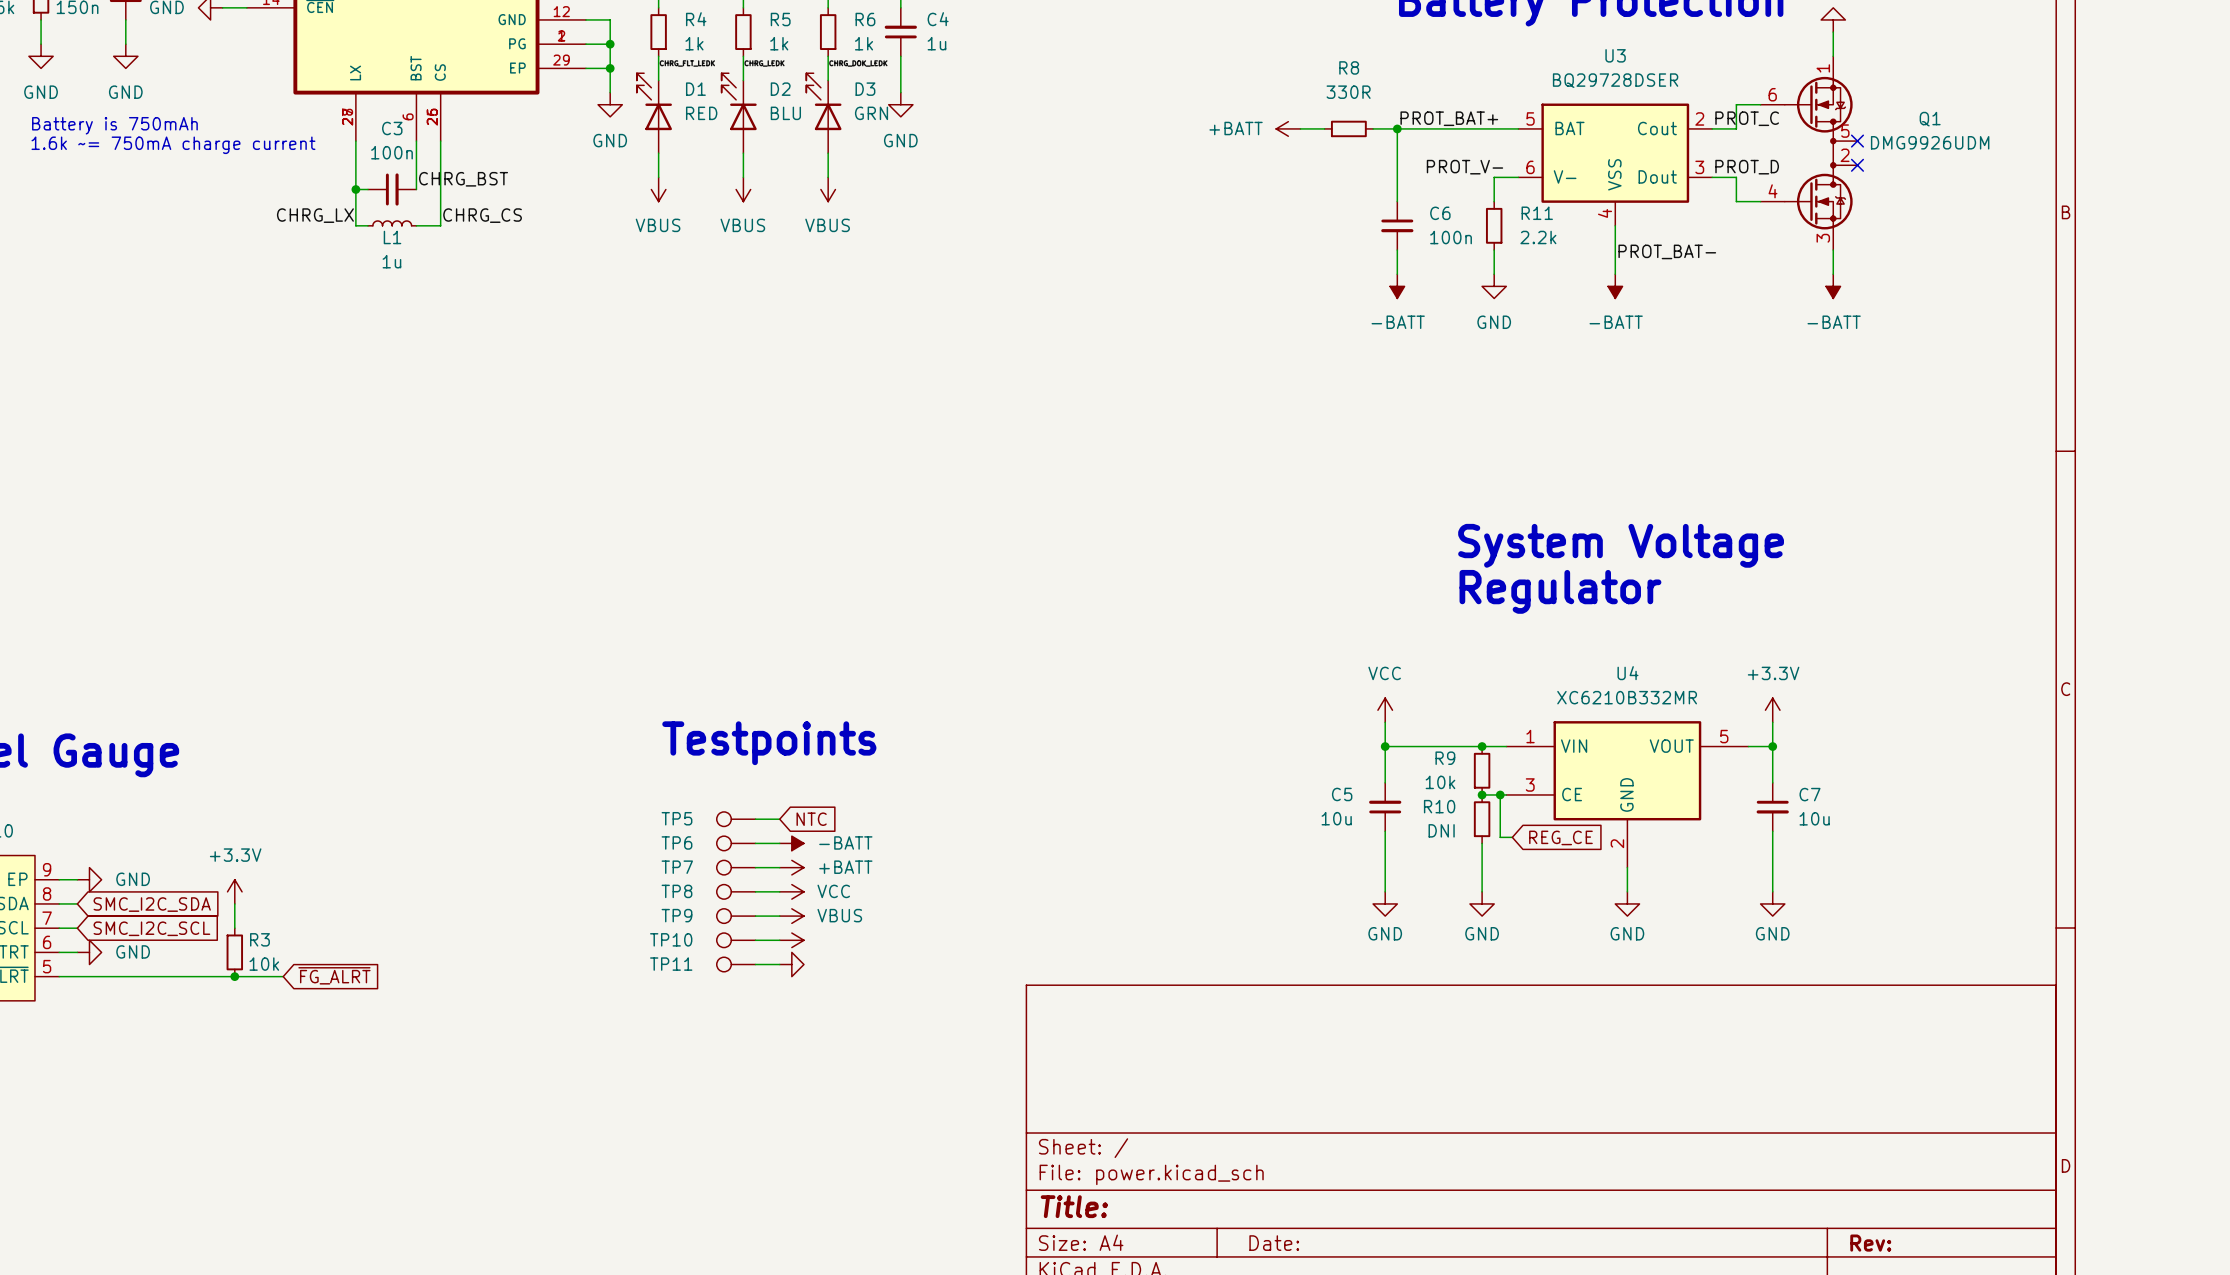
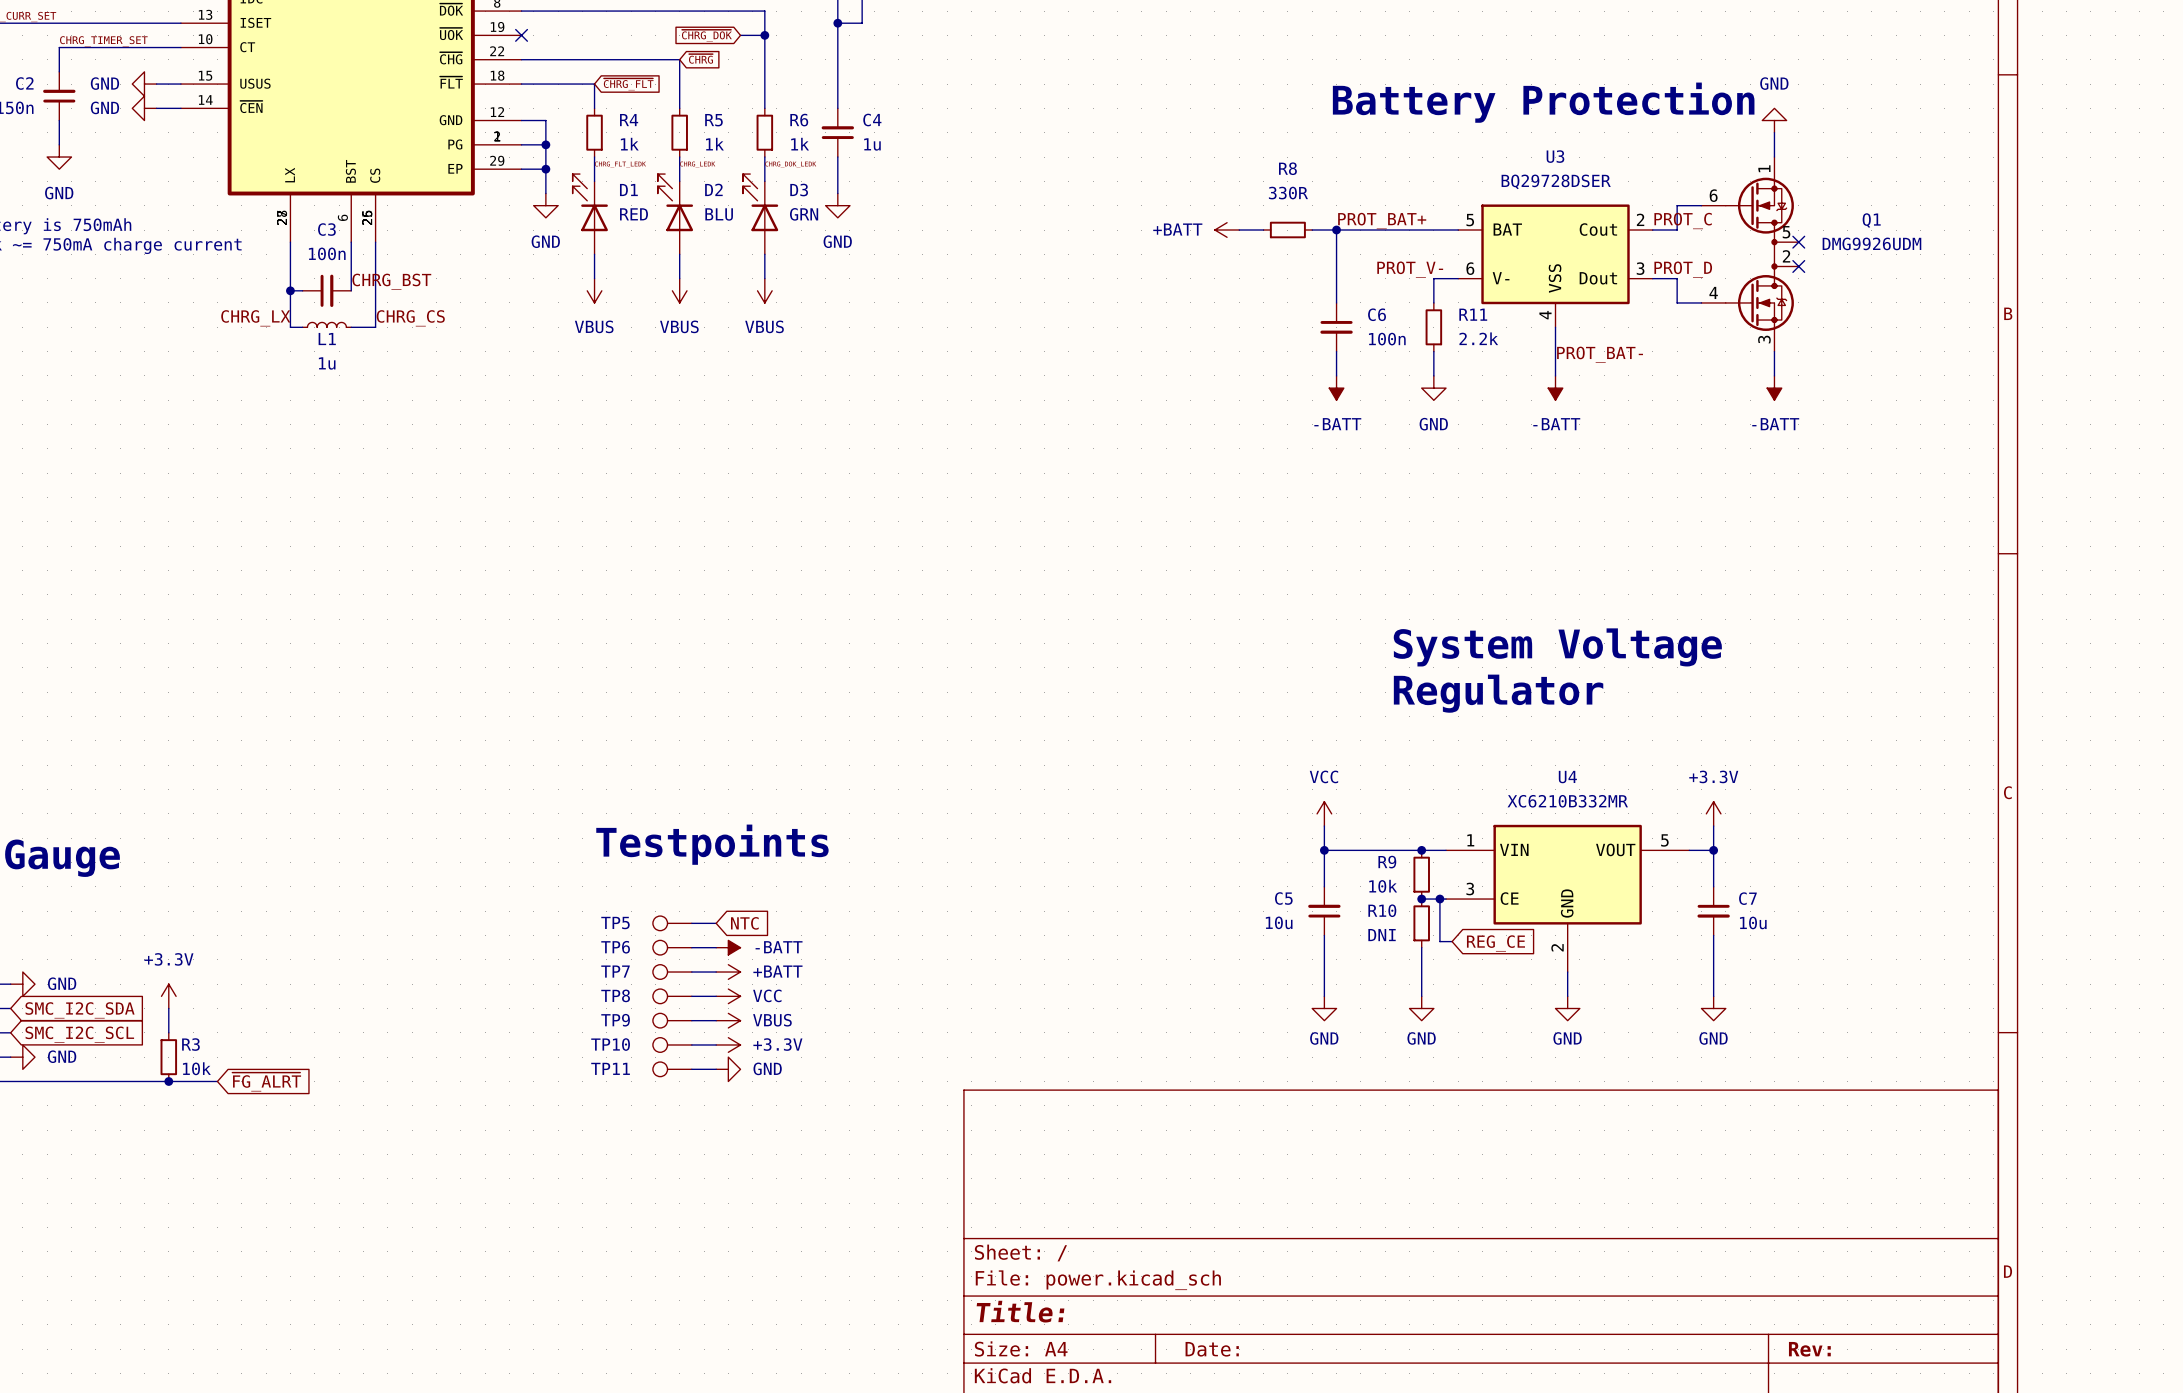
power symbol text: none -> +3.3V (777, 1044)
power symbol text: none -> GND (767, 1068)

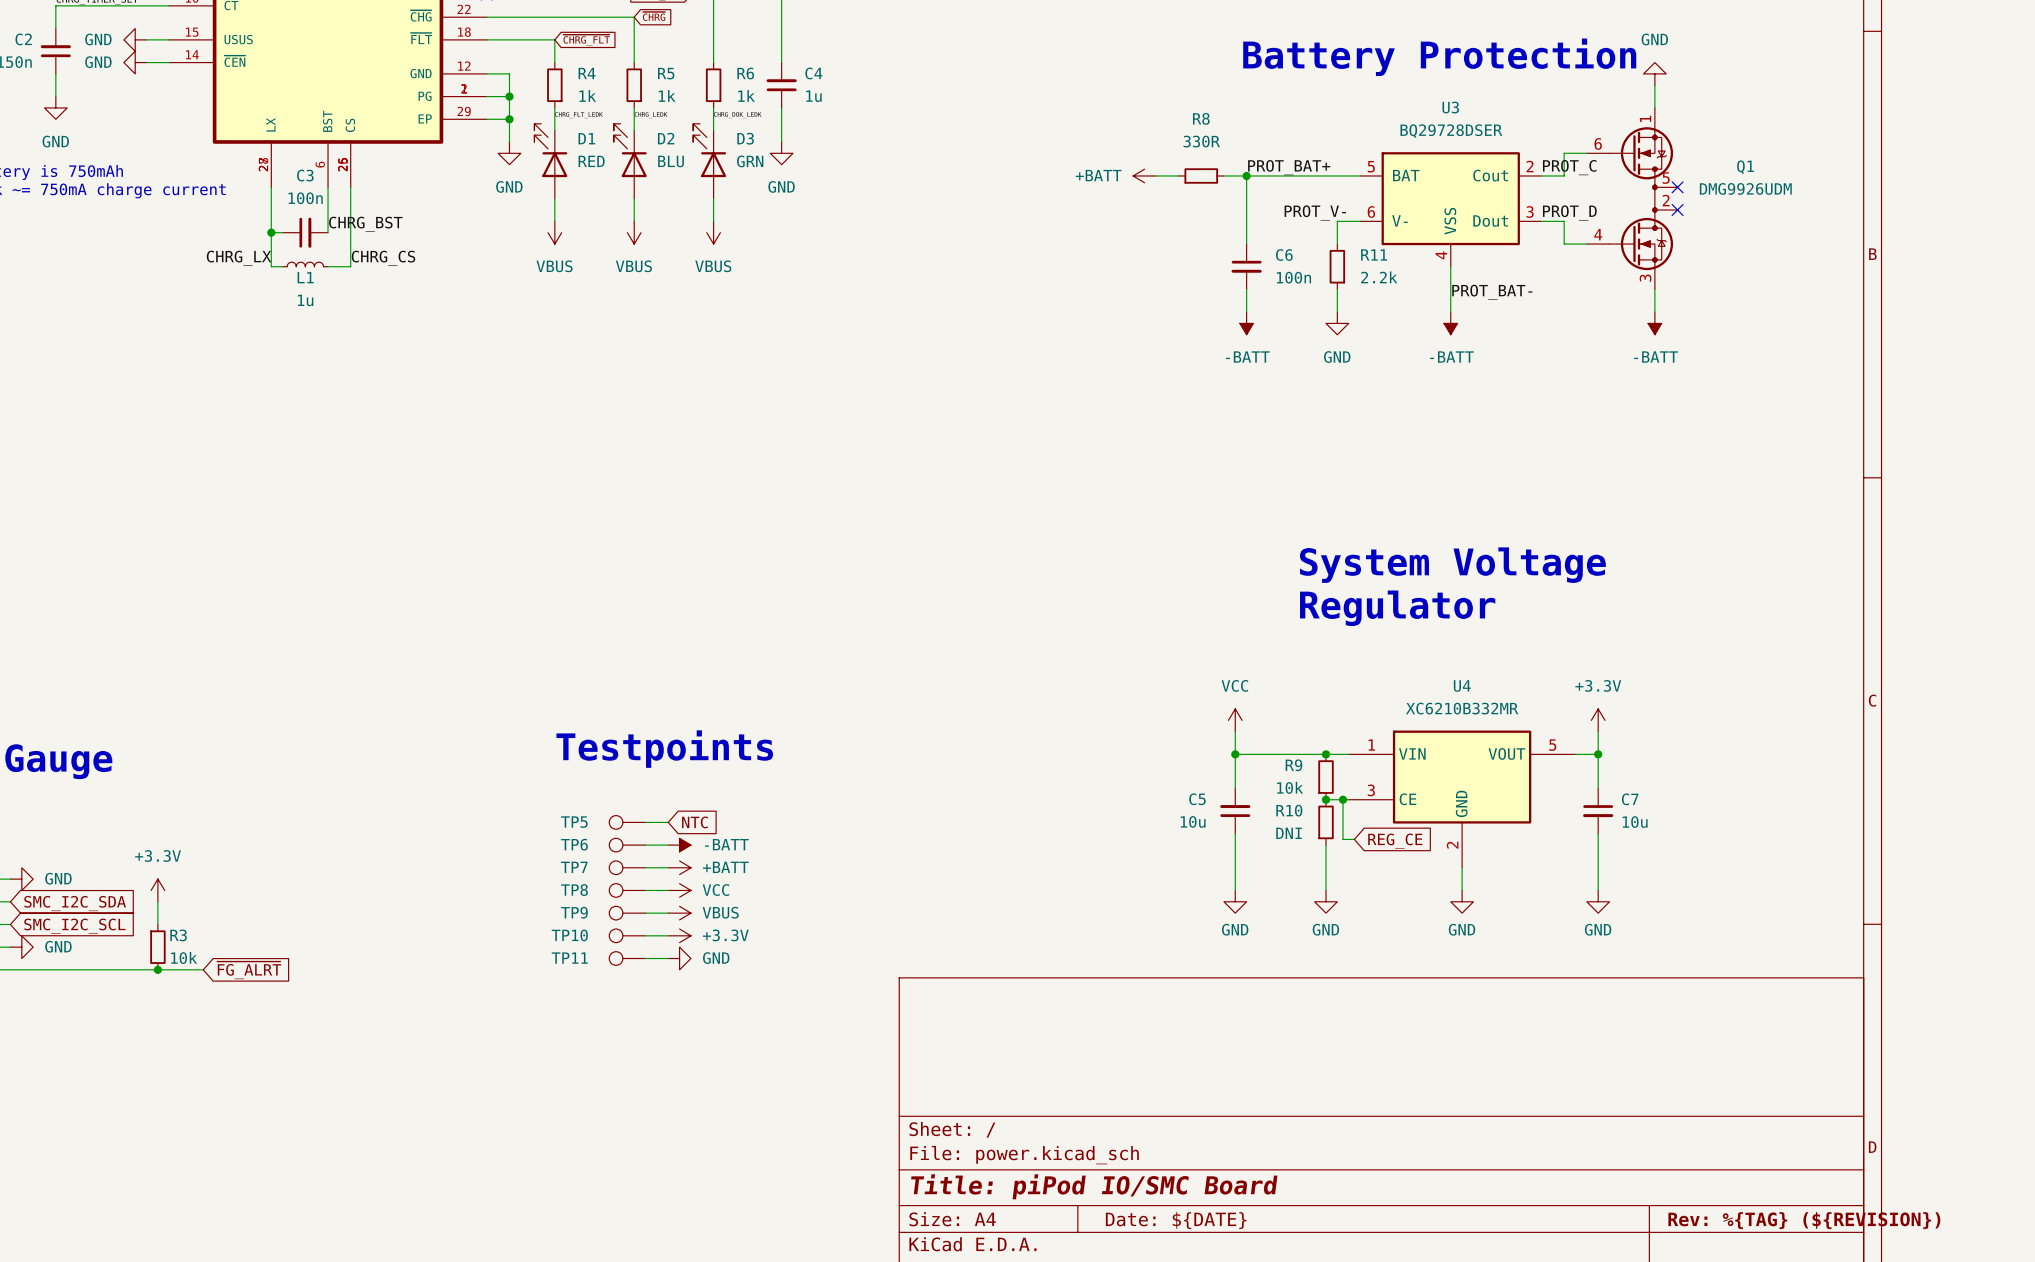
title block: Title: (1020, 1311) -> Title: piPod IO/SMC Board (1094, 1186)
title block: Date: (1212, 1349) -> Date: ${DATE} (1176, 1220)
title block: Rev: (1809, 1349) -> Rev: %{TAG} (${REVISION}) (1804, 1220)

